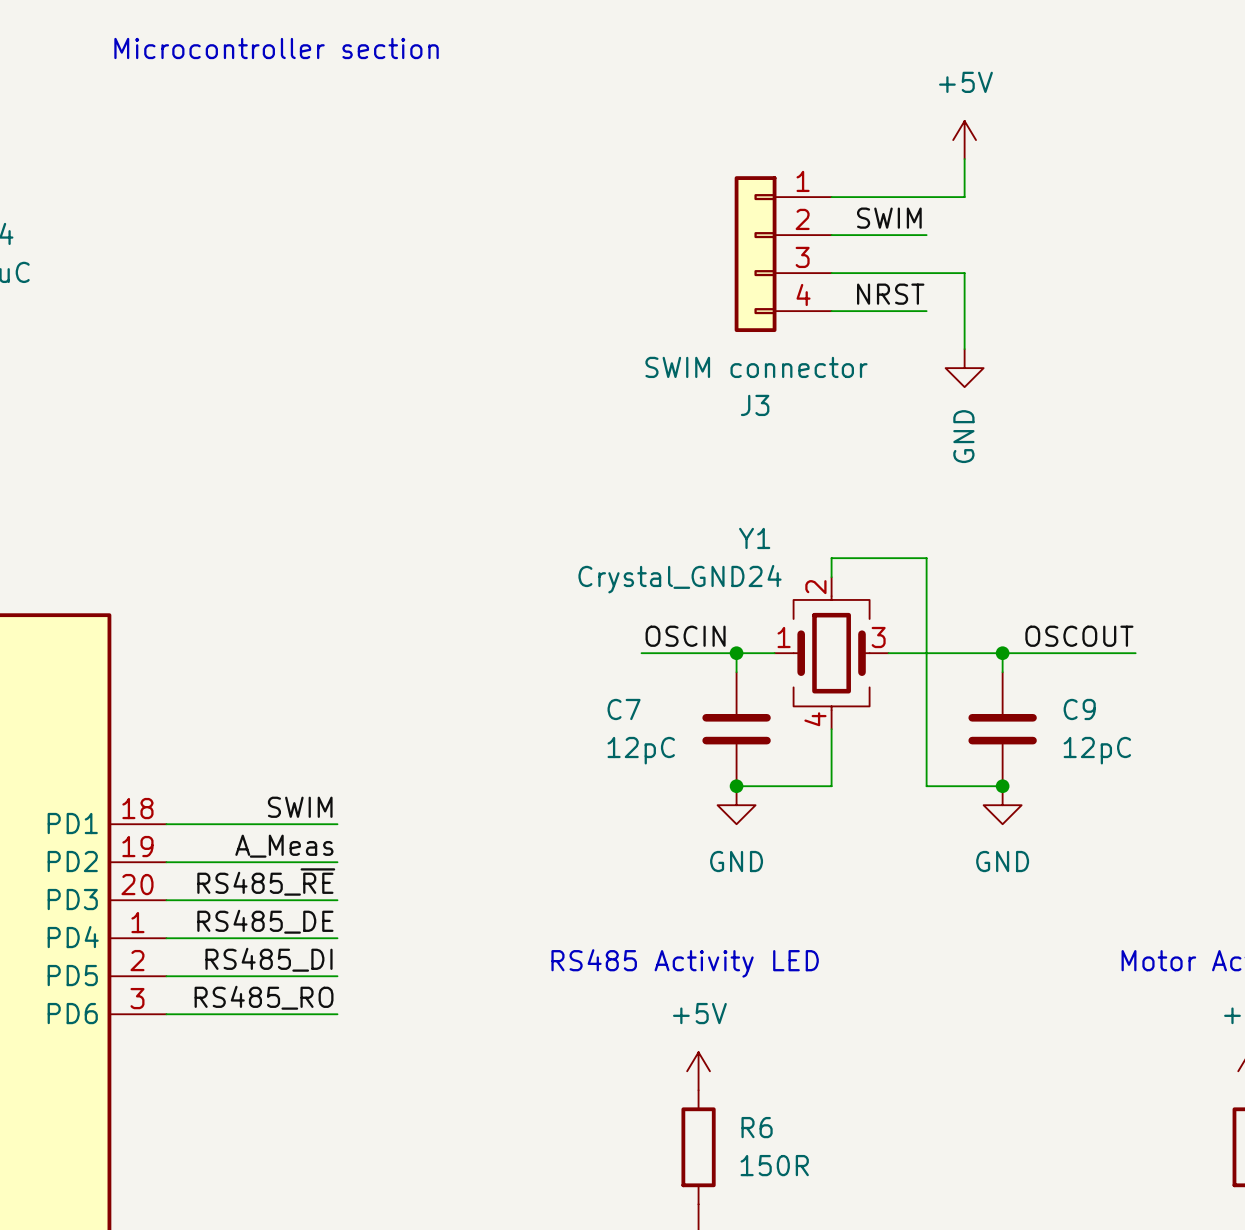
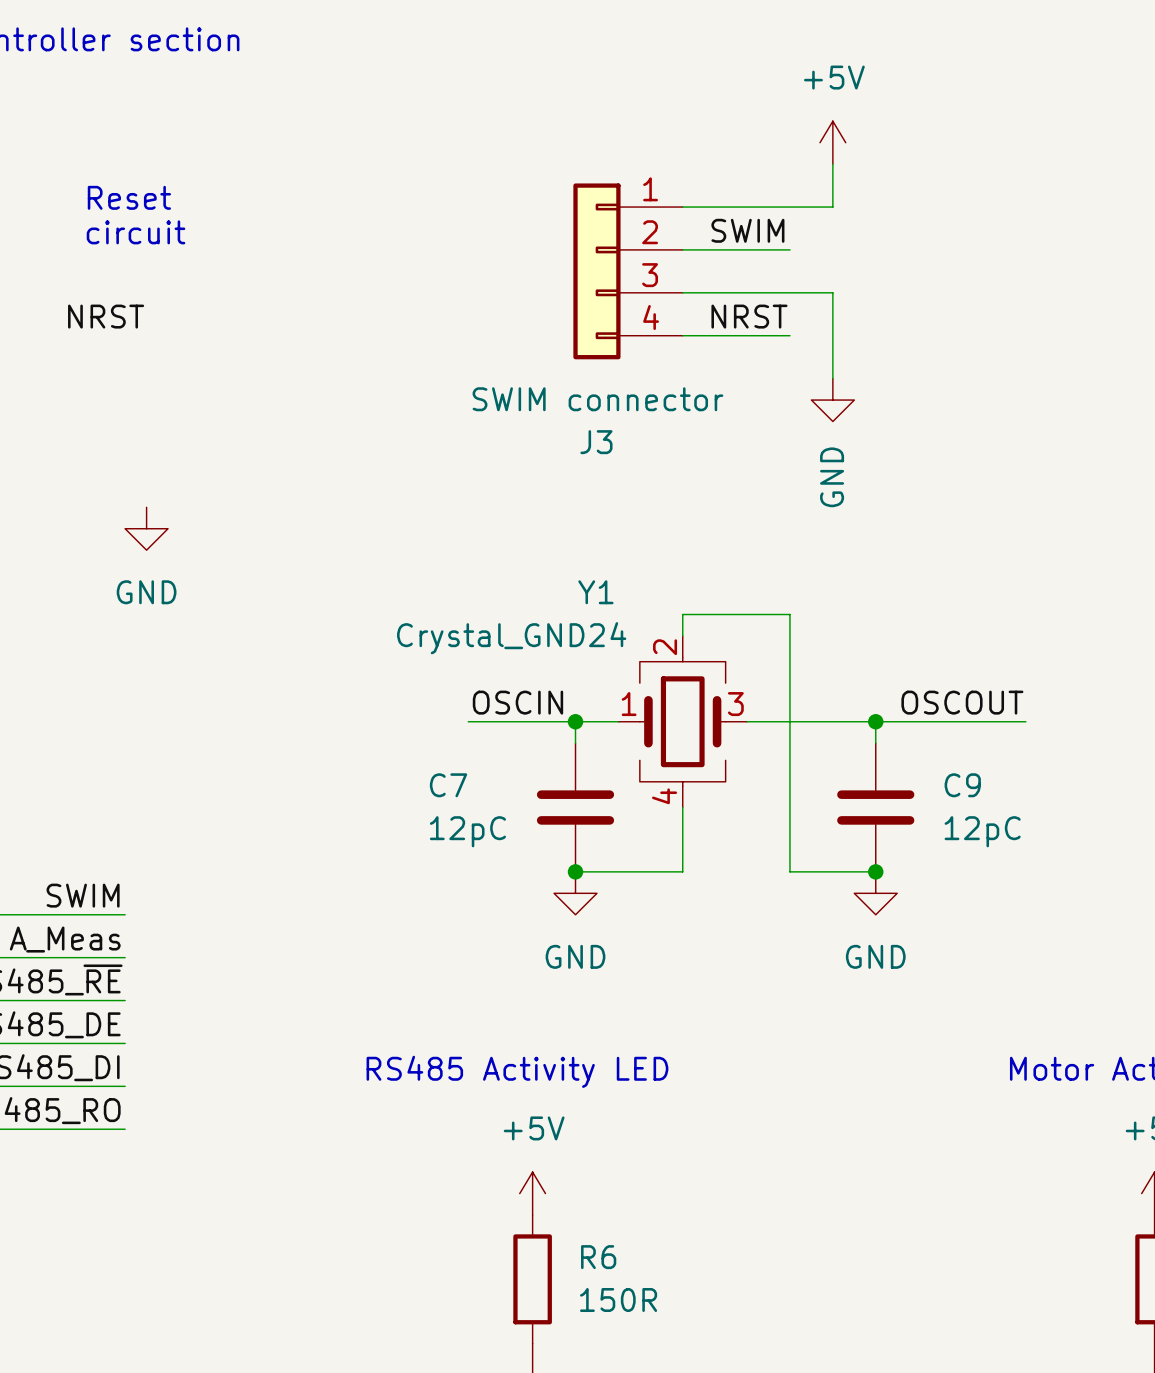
text: none -> Reset (129, 197)
text: none -> circuit (136, 232)
label: none -> NRST (106, 316)
power symbol: none -> GND (146, 528)

